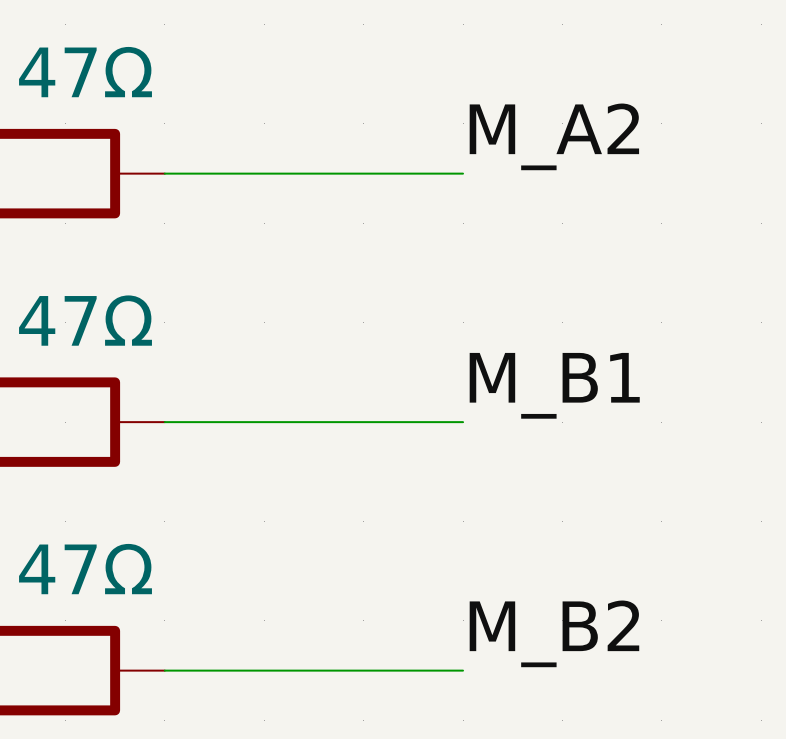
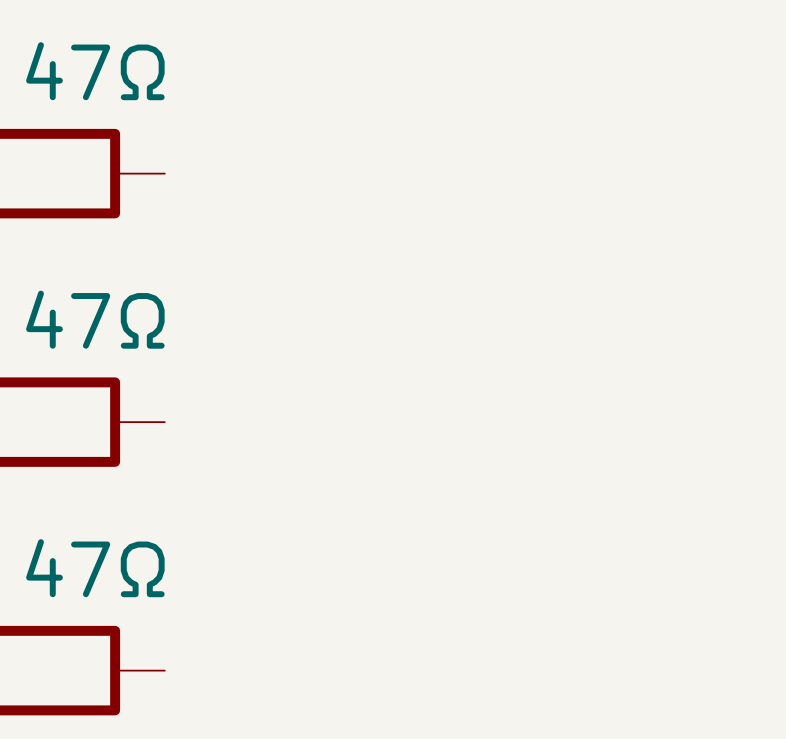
label: M_A2 (554, 136) -> none
wire: (164, 173) (463, 173) -> none
label: M_B1 (554, 385) -> none
wire: (164, 422) (463, 422) -> none
label: M_B2 (554, 633) -> none
wire: (164, 670) (463, 670) -> none

